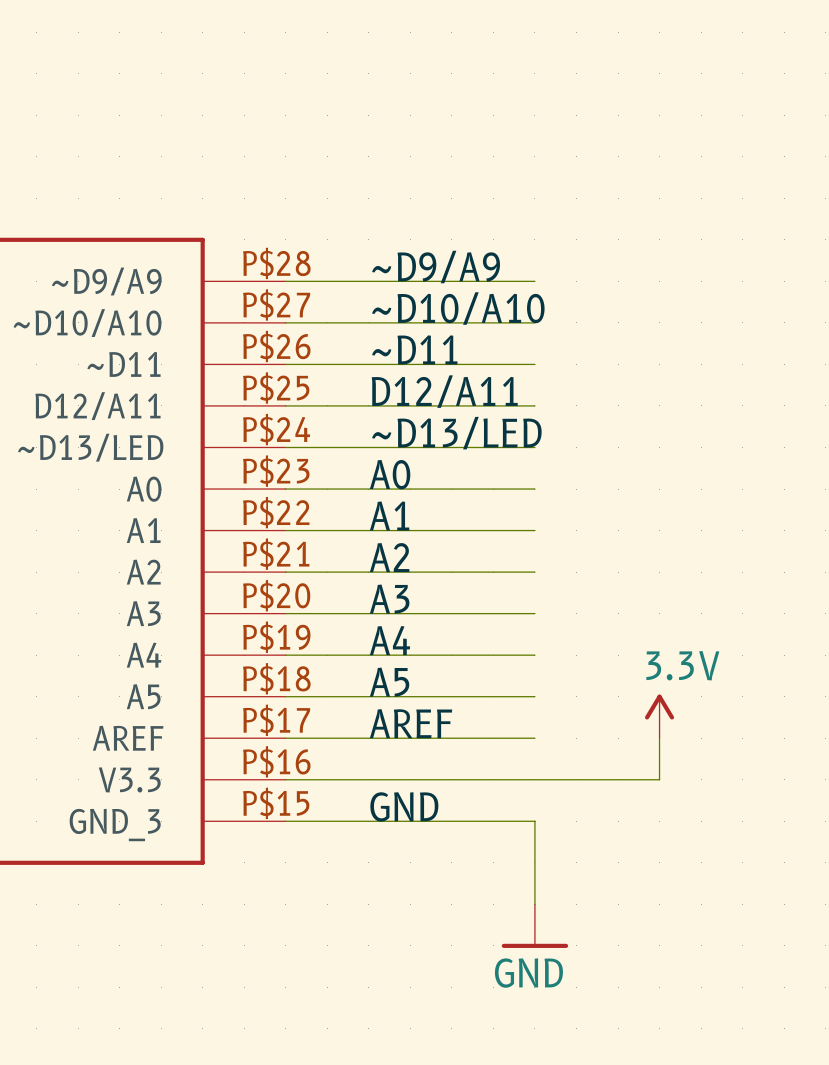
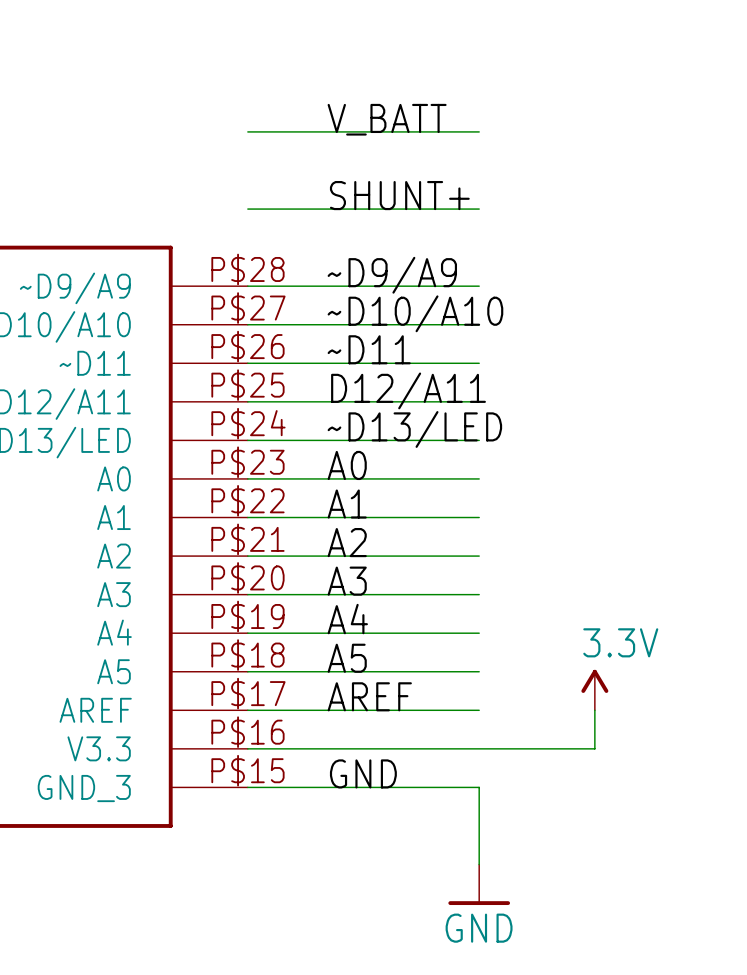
label: none -> V_BATT (387, 119)
wire: none -> (247, 131) (479, 131)
label: none -> SHUNT+ (399, 195)
wire: none -> (247, 209) (479, 209)

